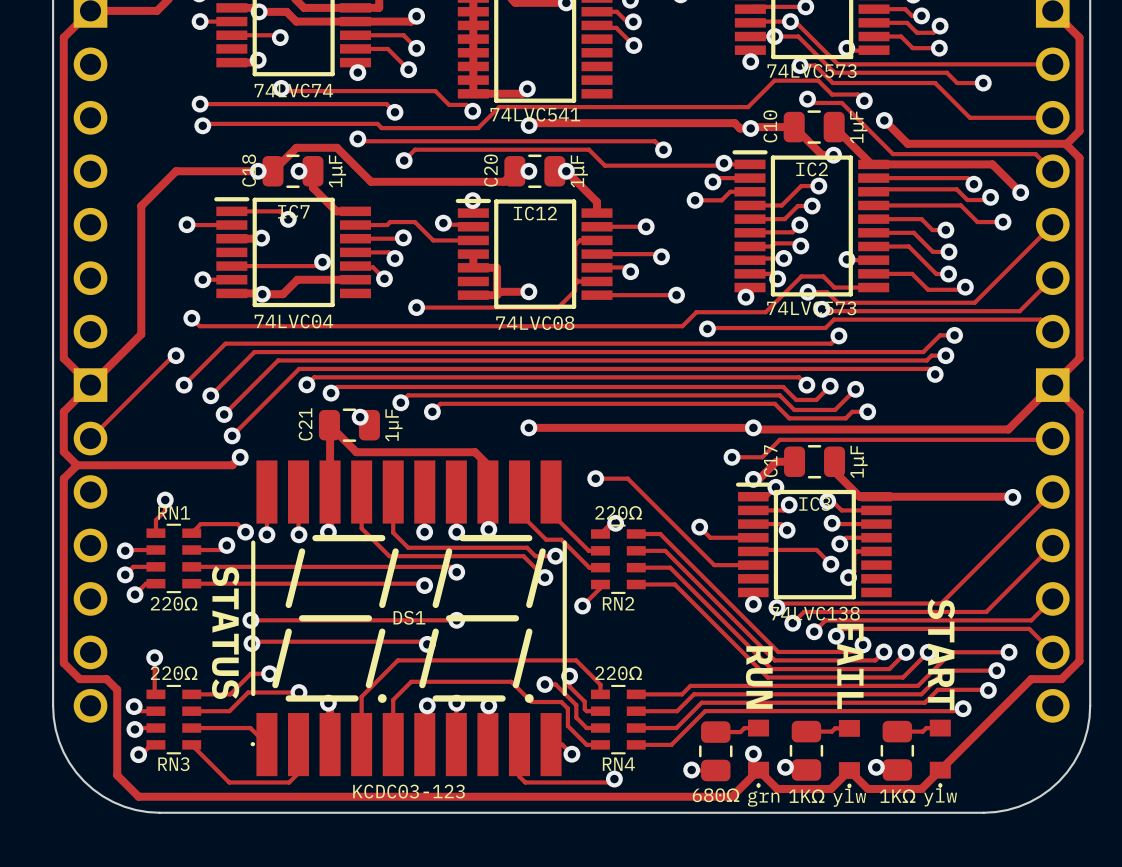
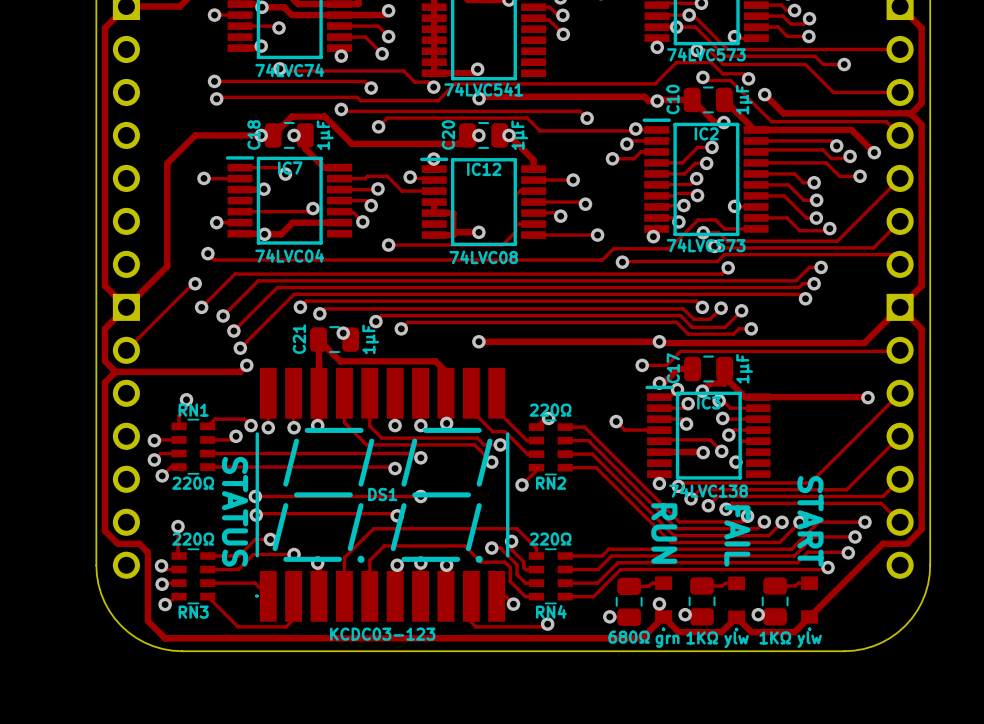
track: none -> (724, 369) (724, 383) (710, 383) (702, 391)
track: (595, 478) (627, 478) (714, 565) (753, 565) -> (703, 452) (659, 452)
via: (595, 478) -> none
via: none -> (702, 391)
via: none -> (703, 452)

